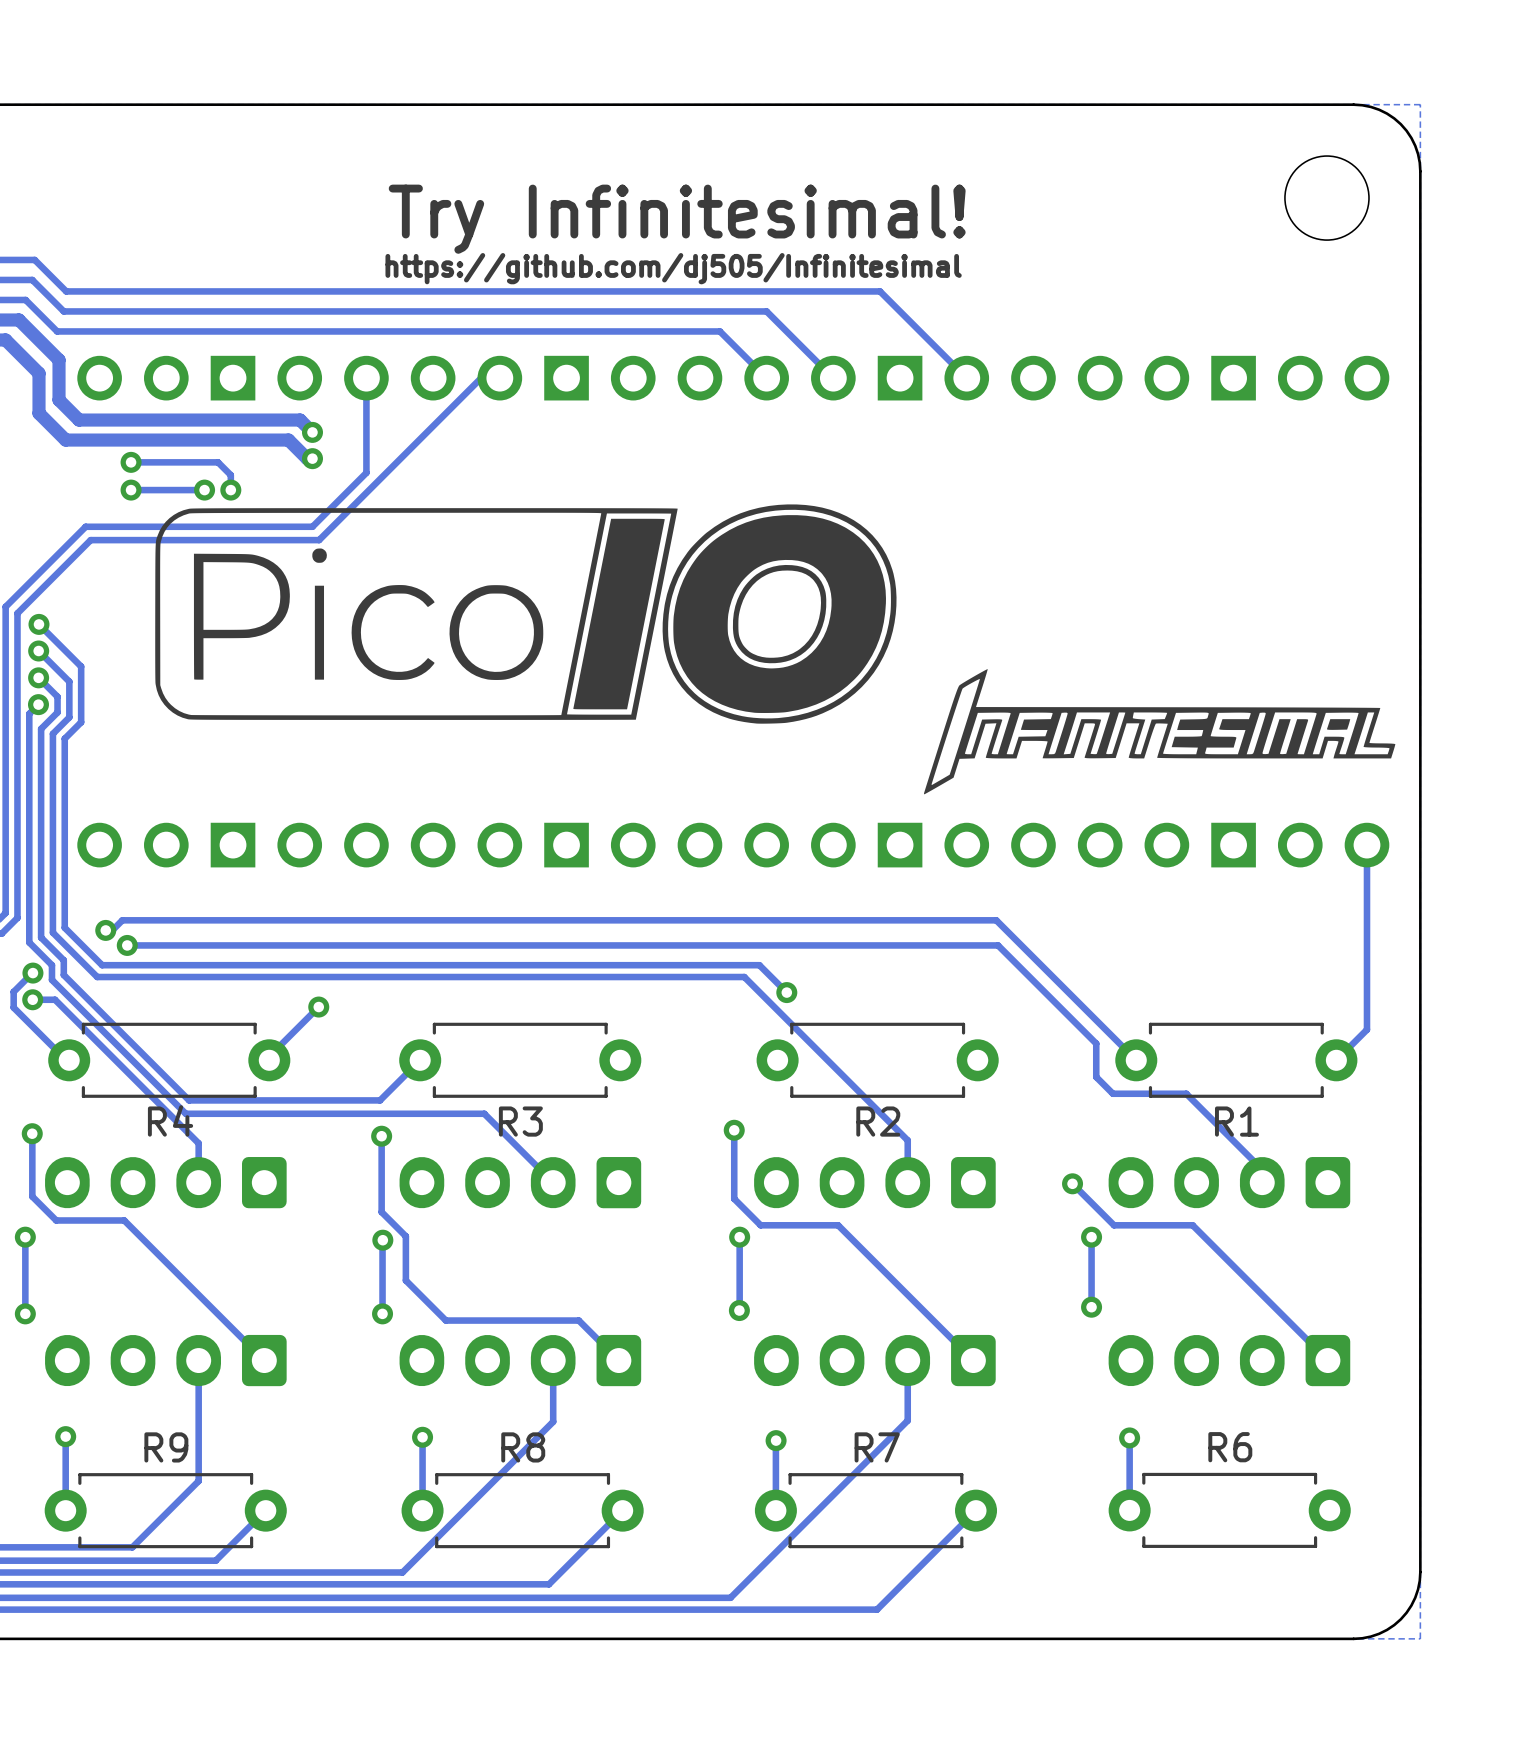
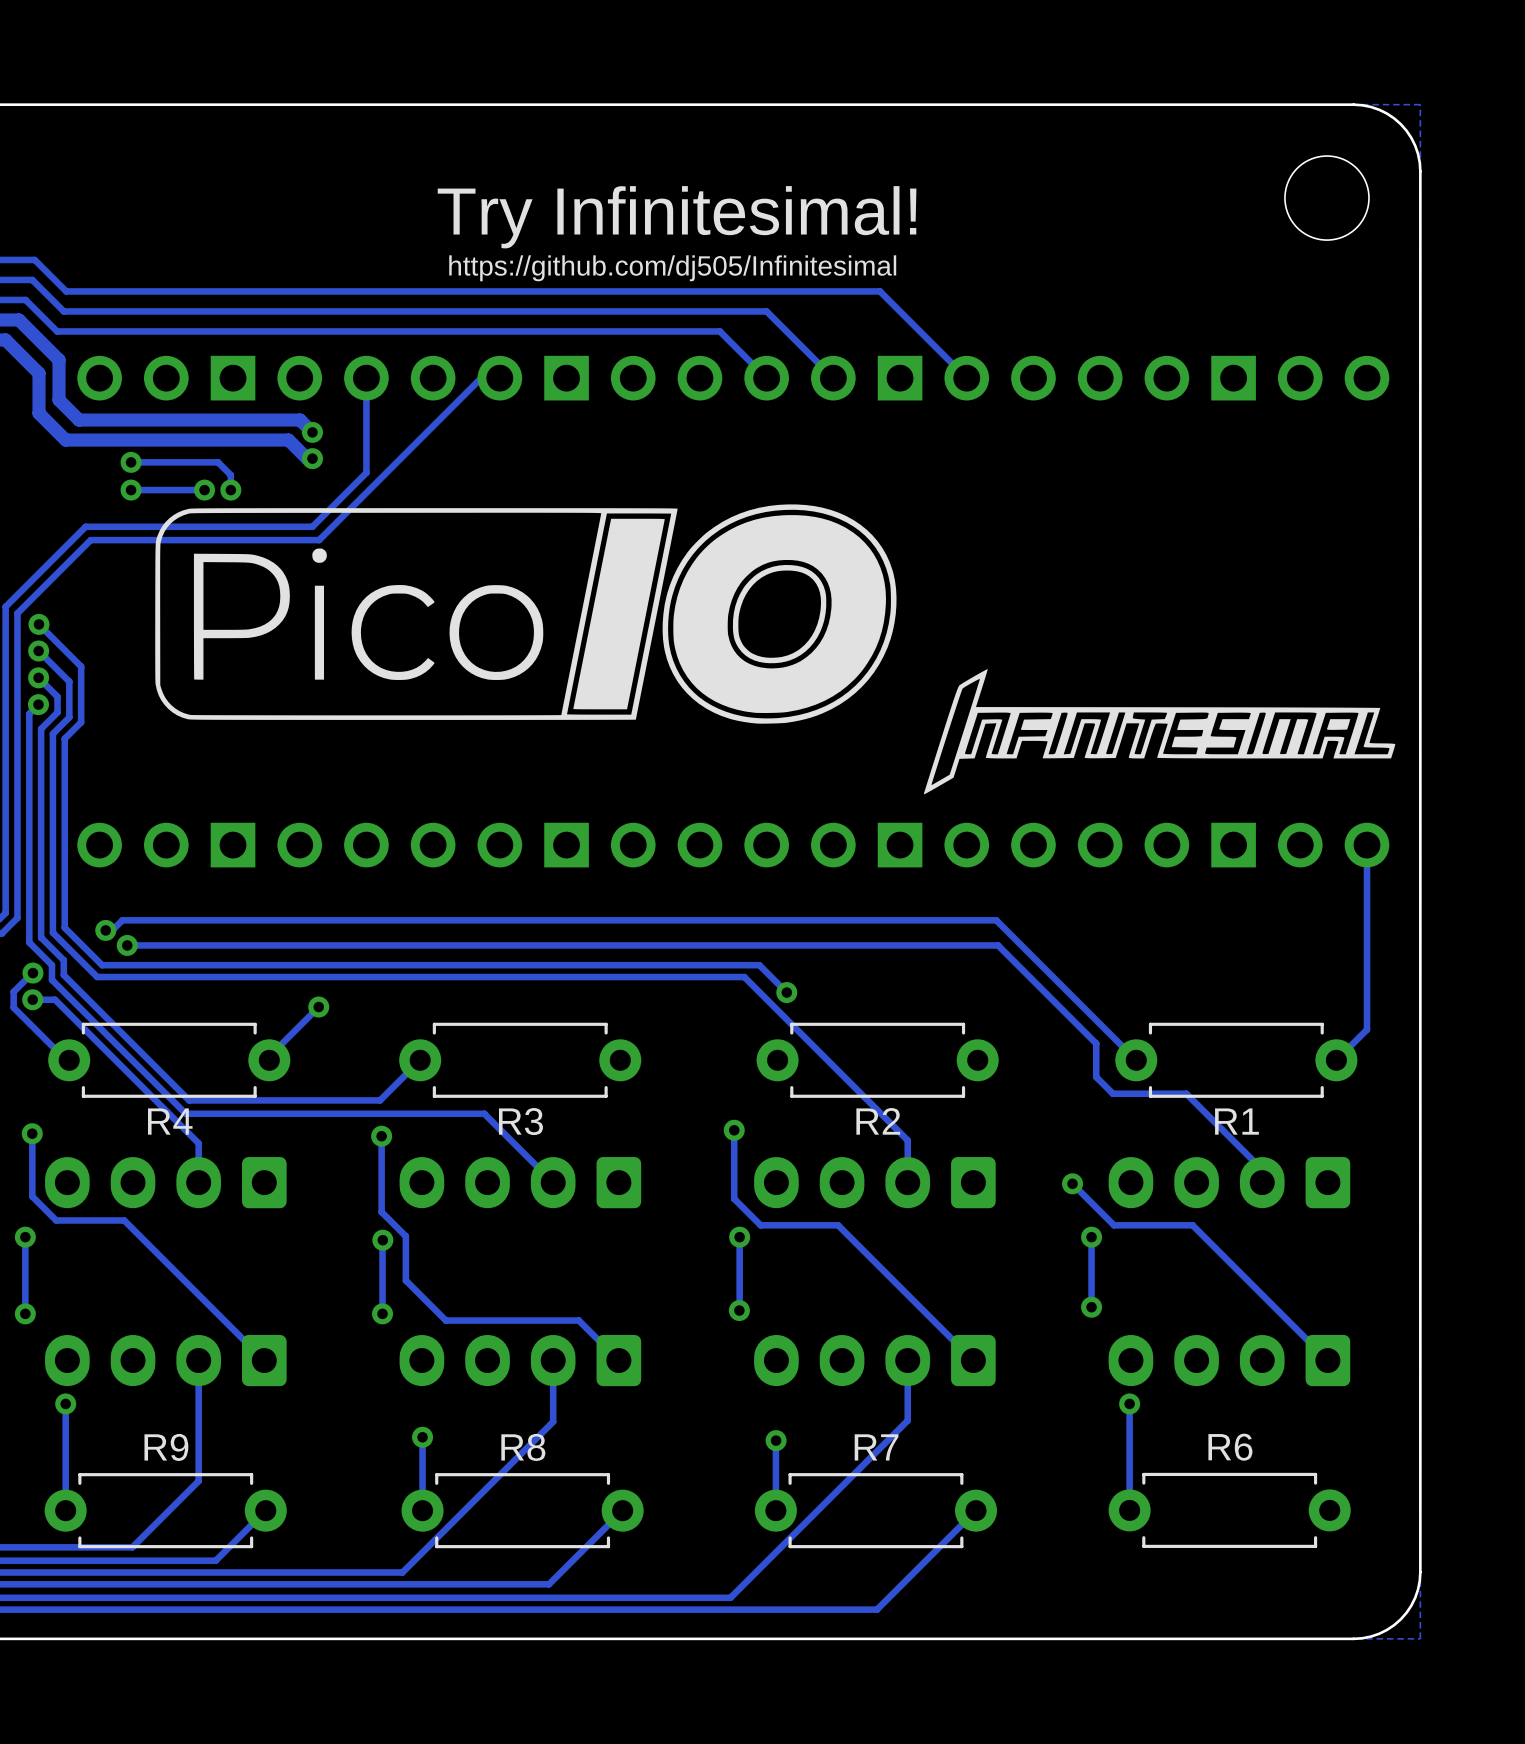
track: none -> (65, 1403) (65, 1436)
track: none -> (1129, 1403) (1129, 1437)
via position: (65, 1436) -> (65, 1403)
via position: (1129, 1437) -> (1129, 1403)

